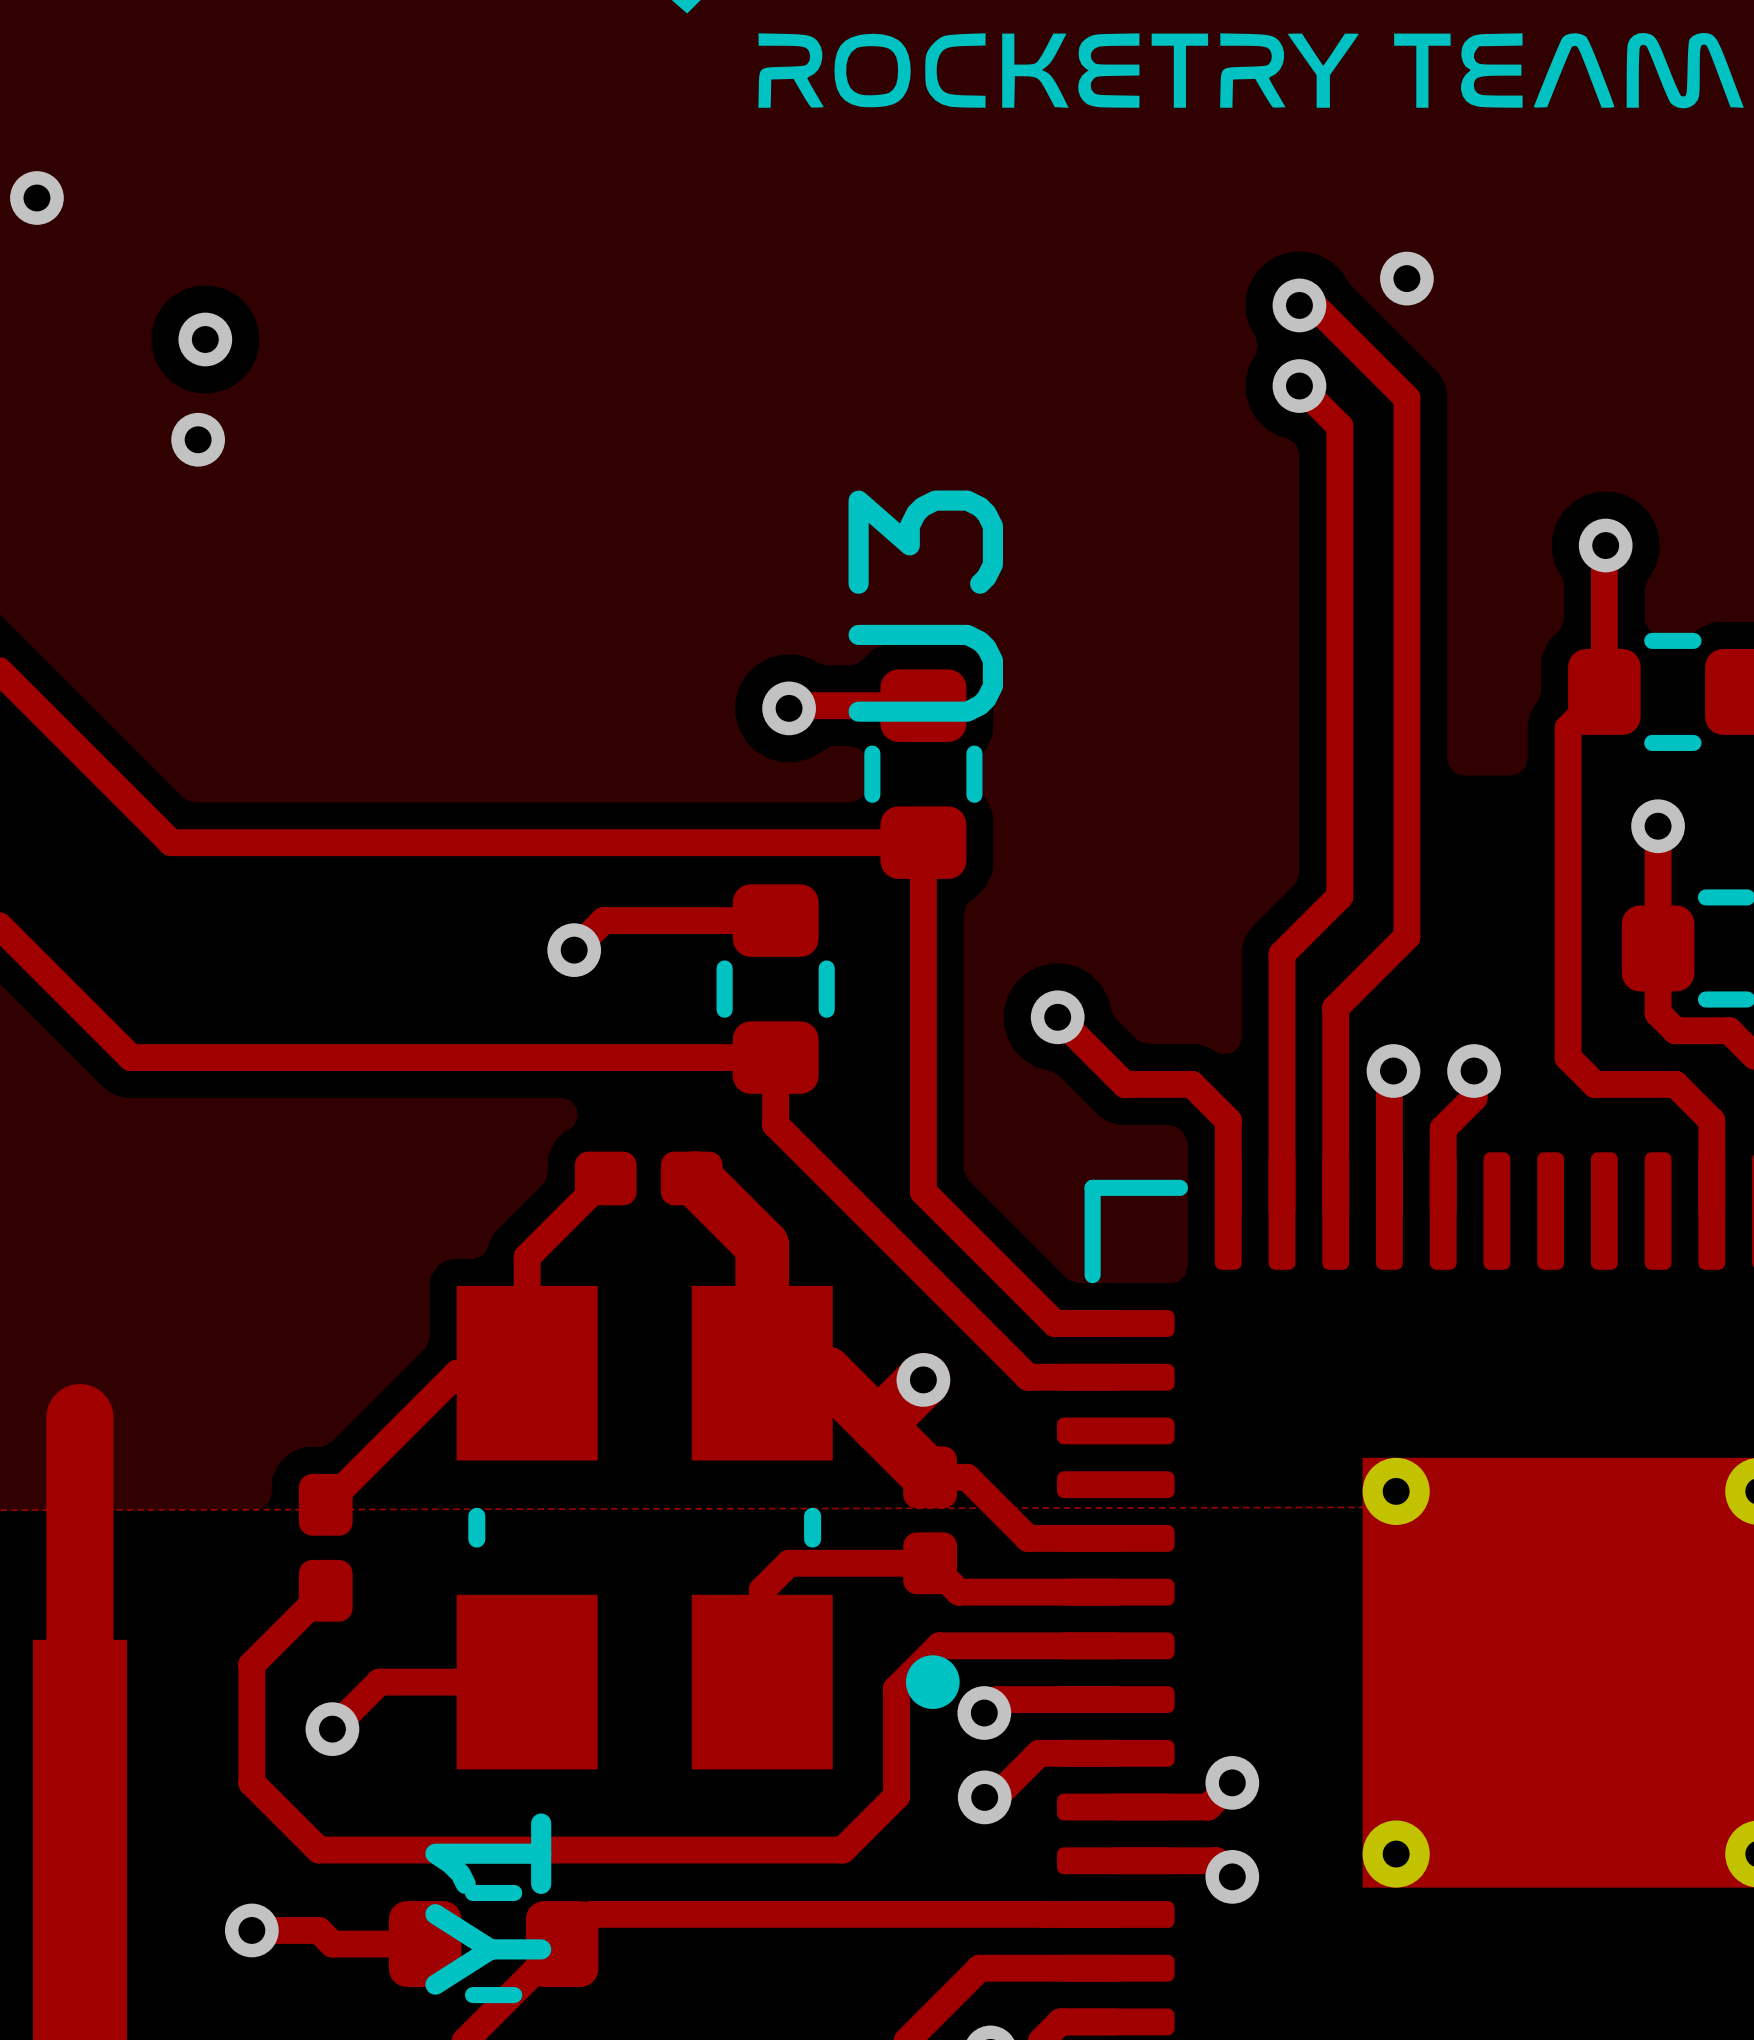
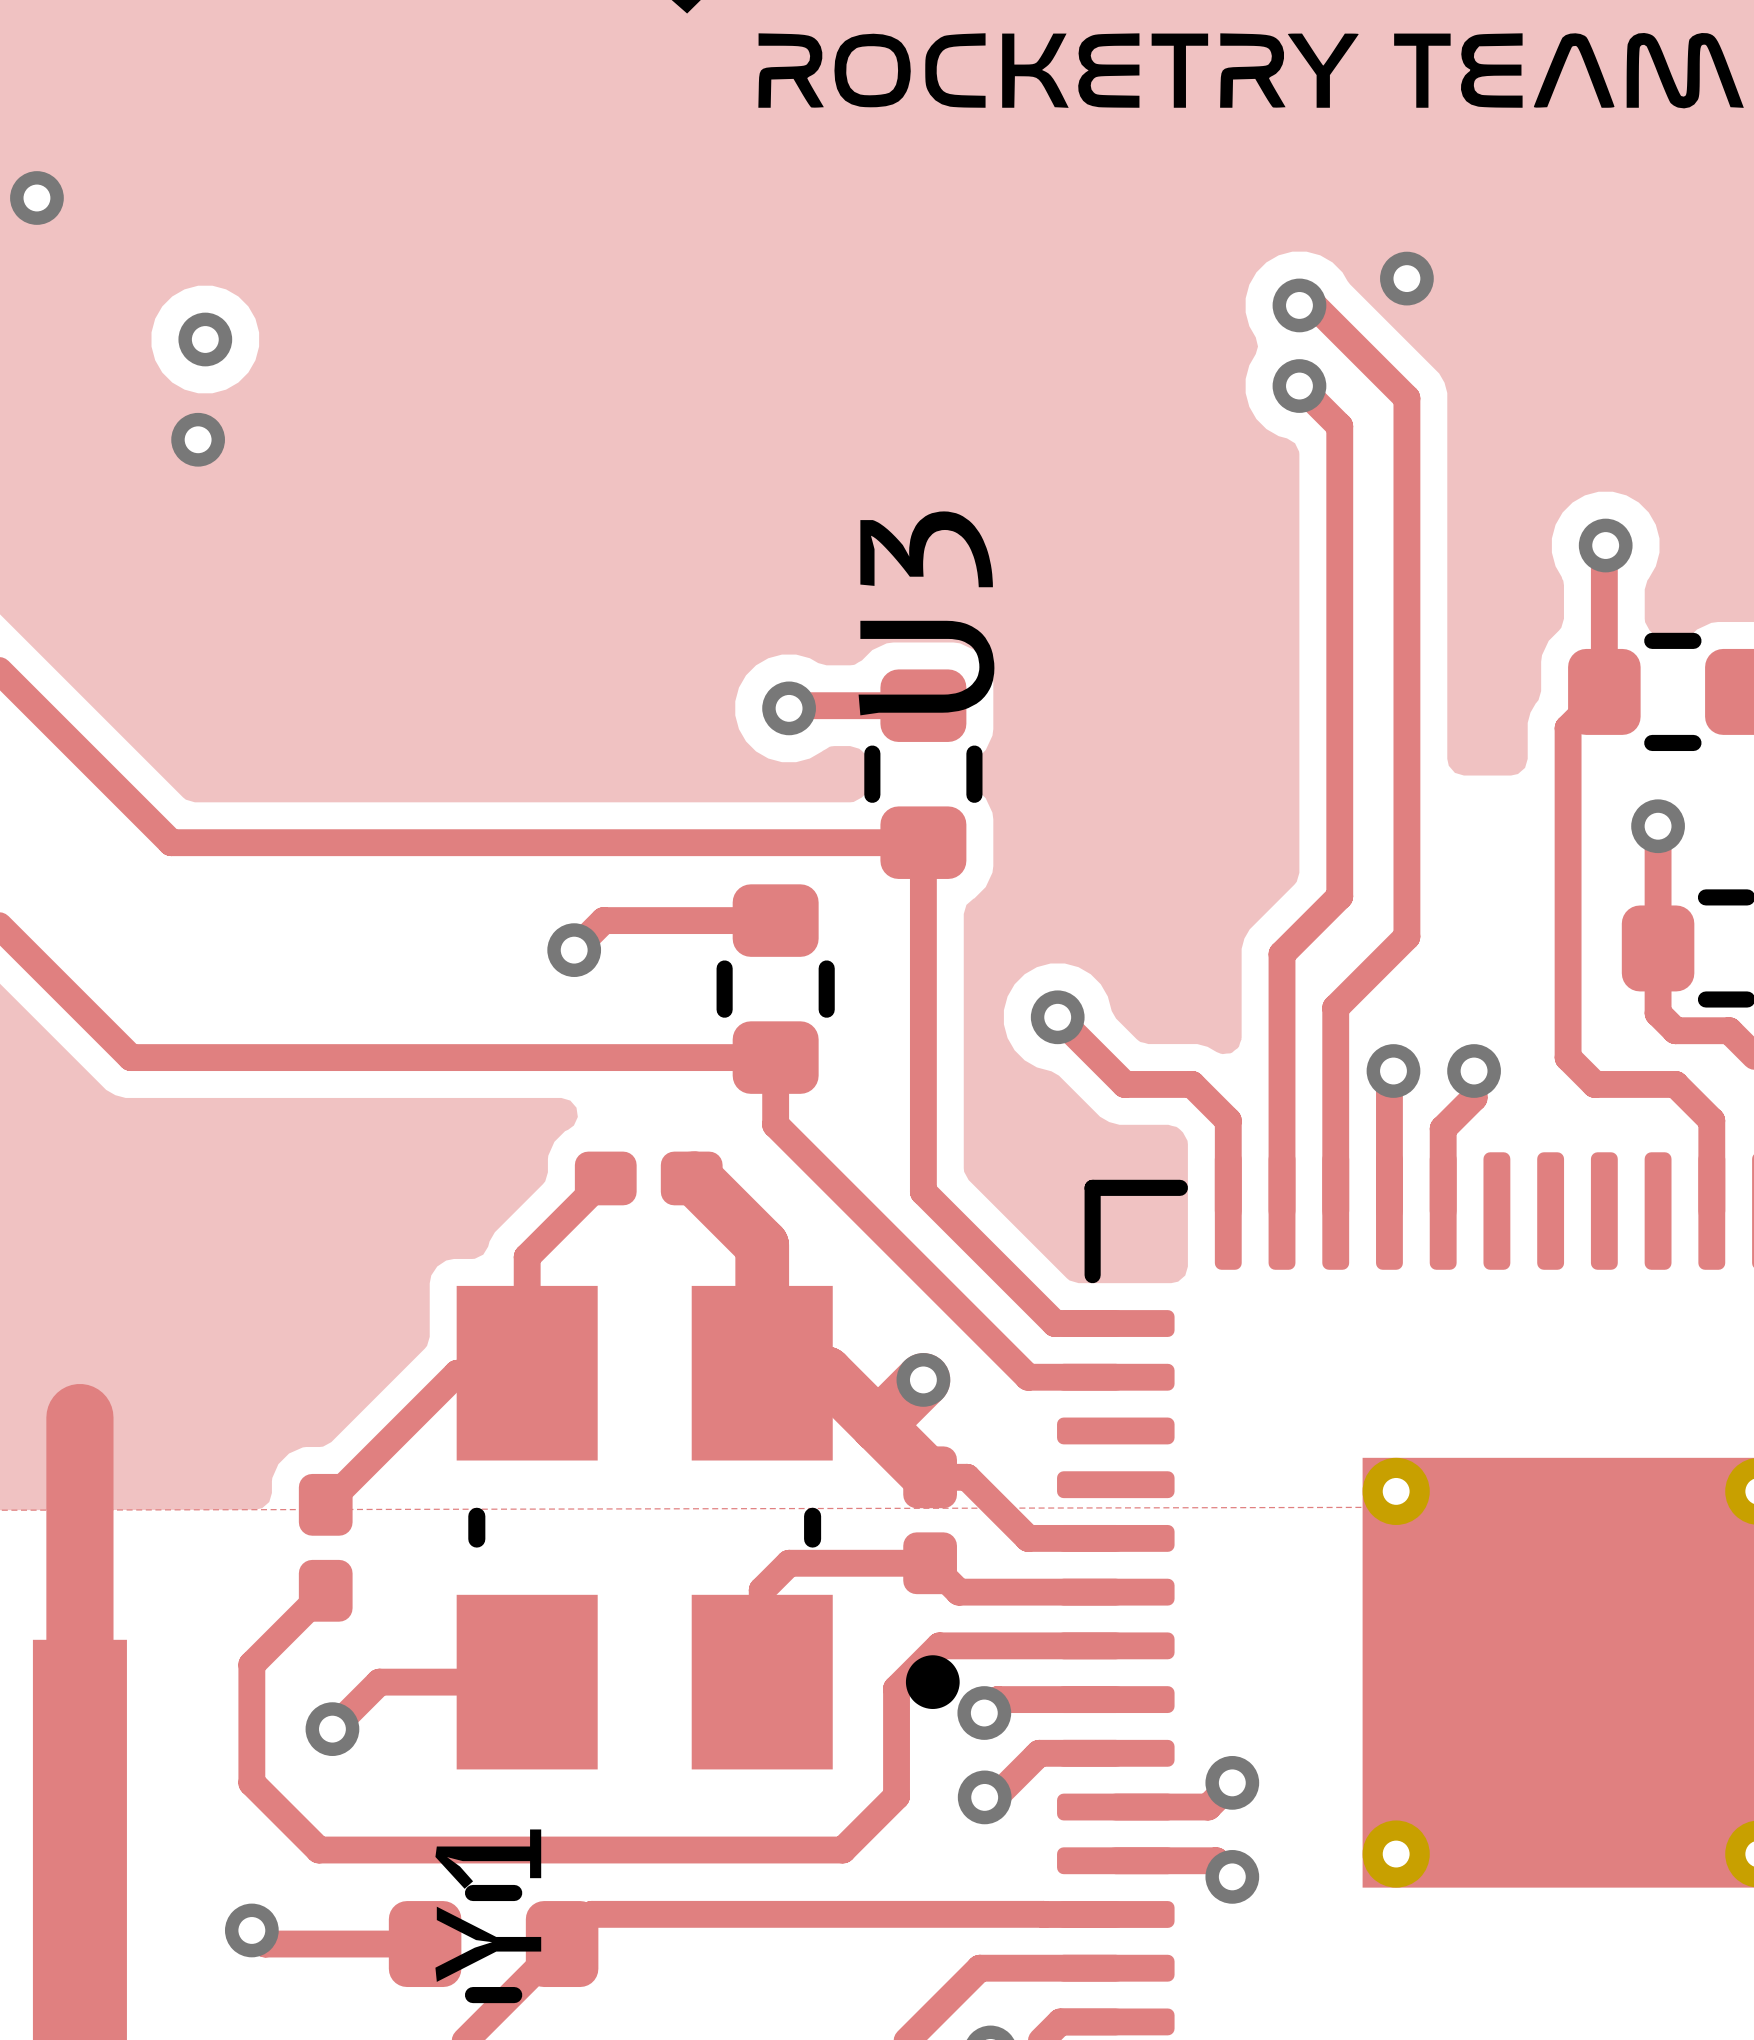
track: (251, 1930) (318, 1930) (332, 1944) -> (251, 1930) (265, 1944) (332, 1944)

